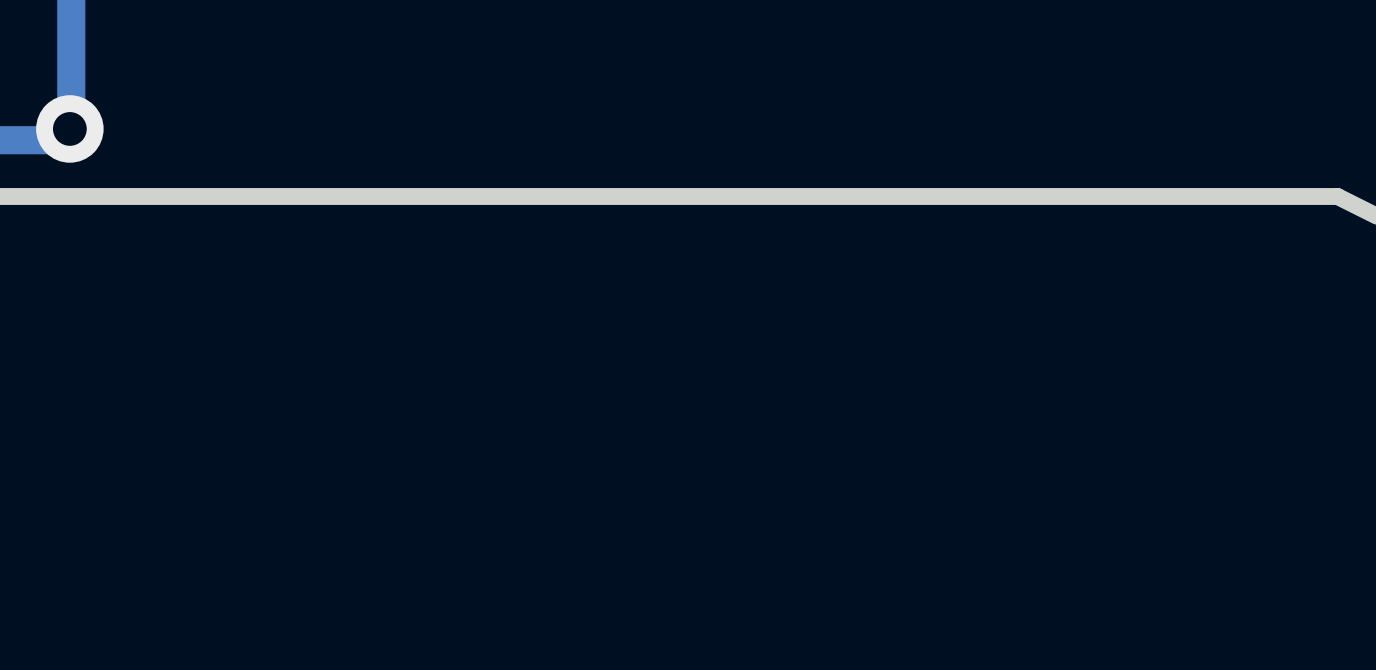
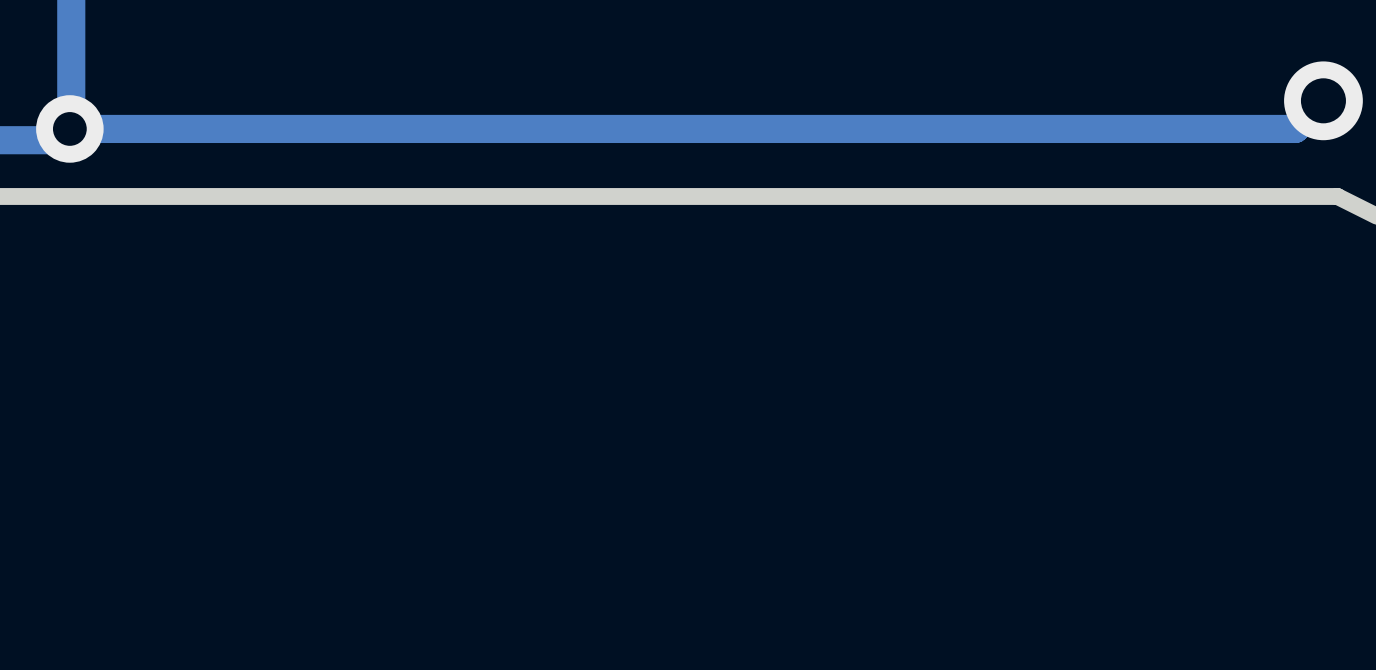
track: none -> (1323, 100) (1295, 128) (69, 128)
via: none -> (1323, 100)

